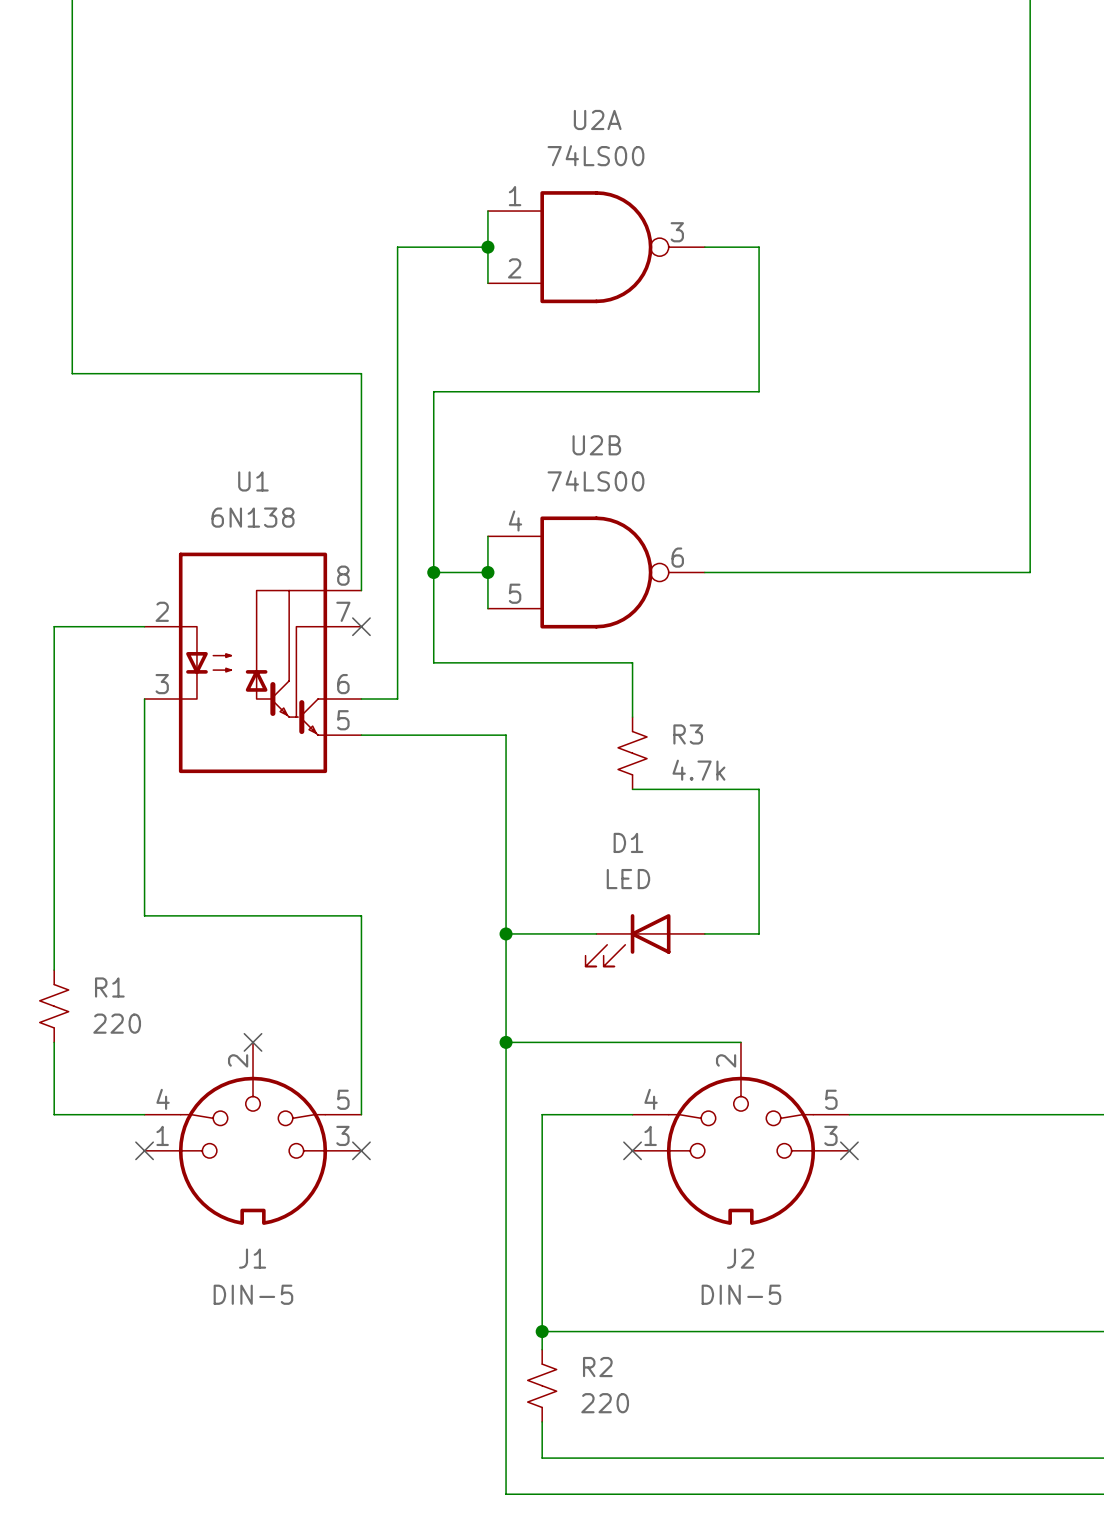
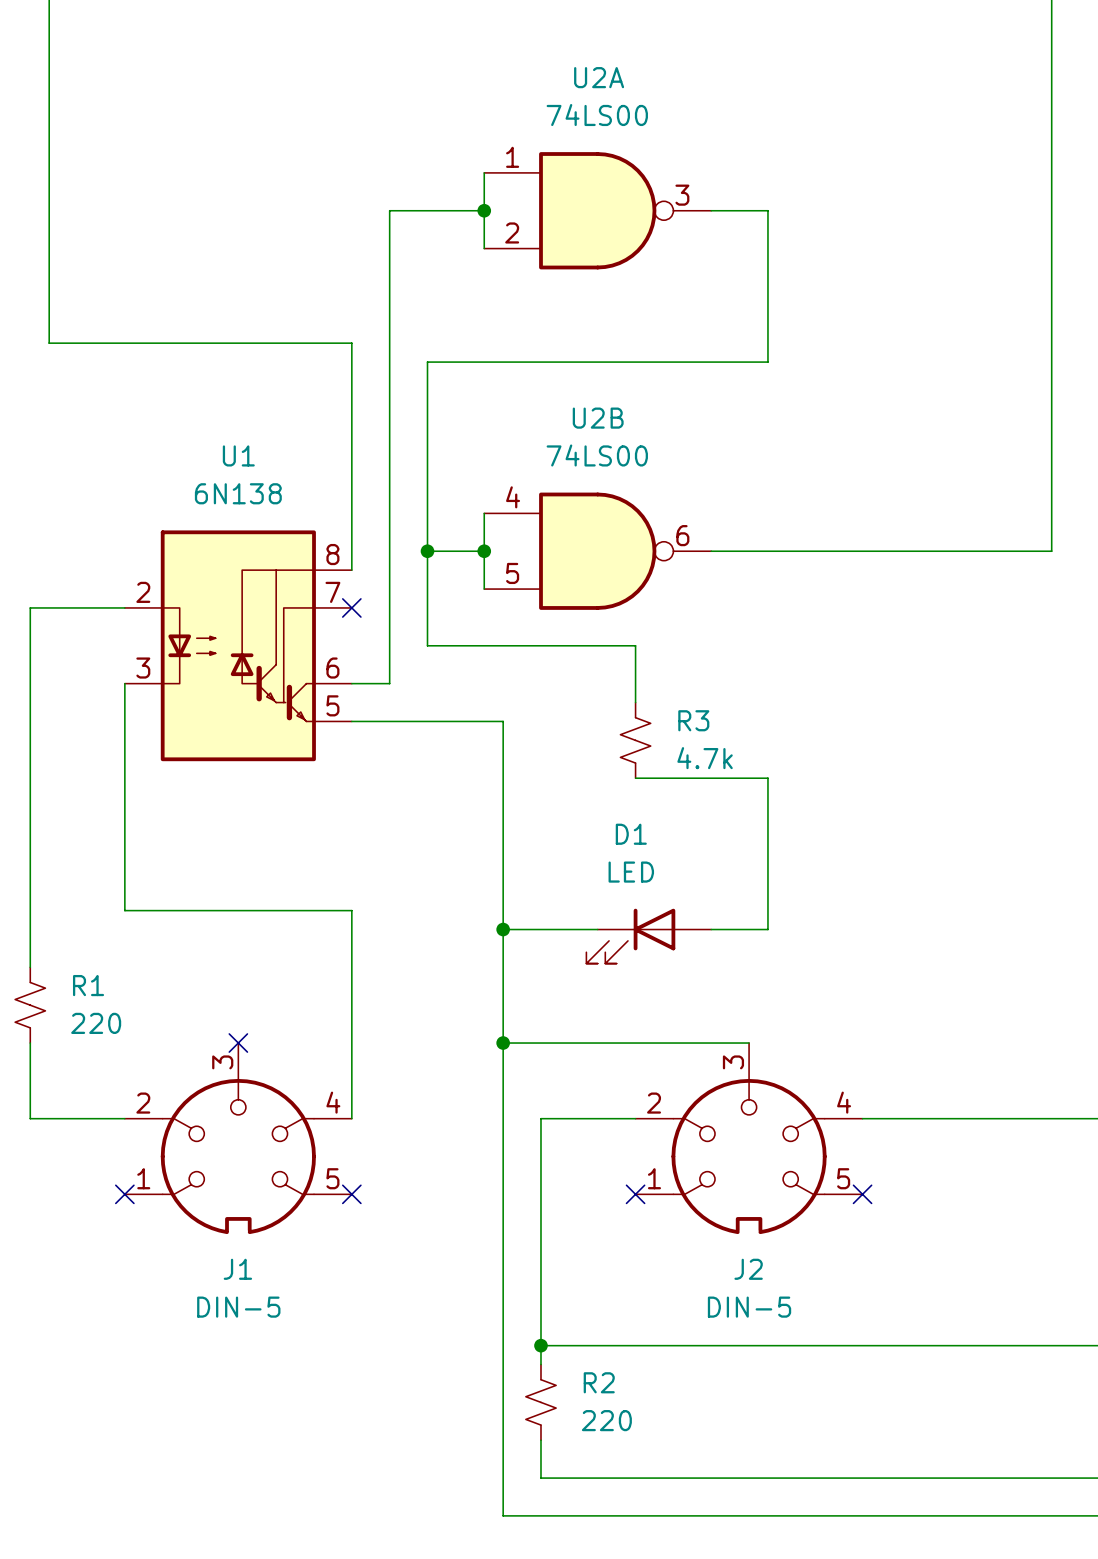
J1 symbol: [144, 1042, 362, 1225] -> [124, 1043, 352, 1235]
J2 symbol: [632, 1042, 850, 1225] -> [635, 1043, 863, 1235]
no-connect mark position: (144, 1150) -> (124, 1194)
no-connect mark position: (361, 1150) -> (351, 1194)
no-connect mark position: (632, 1150) -> (635, 1194)
no-connect mark position: (849, 1150) -> (862, 1194)

